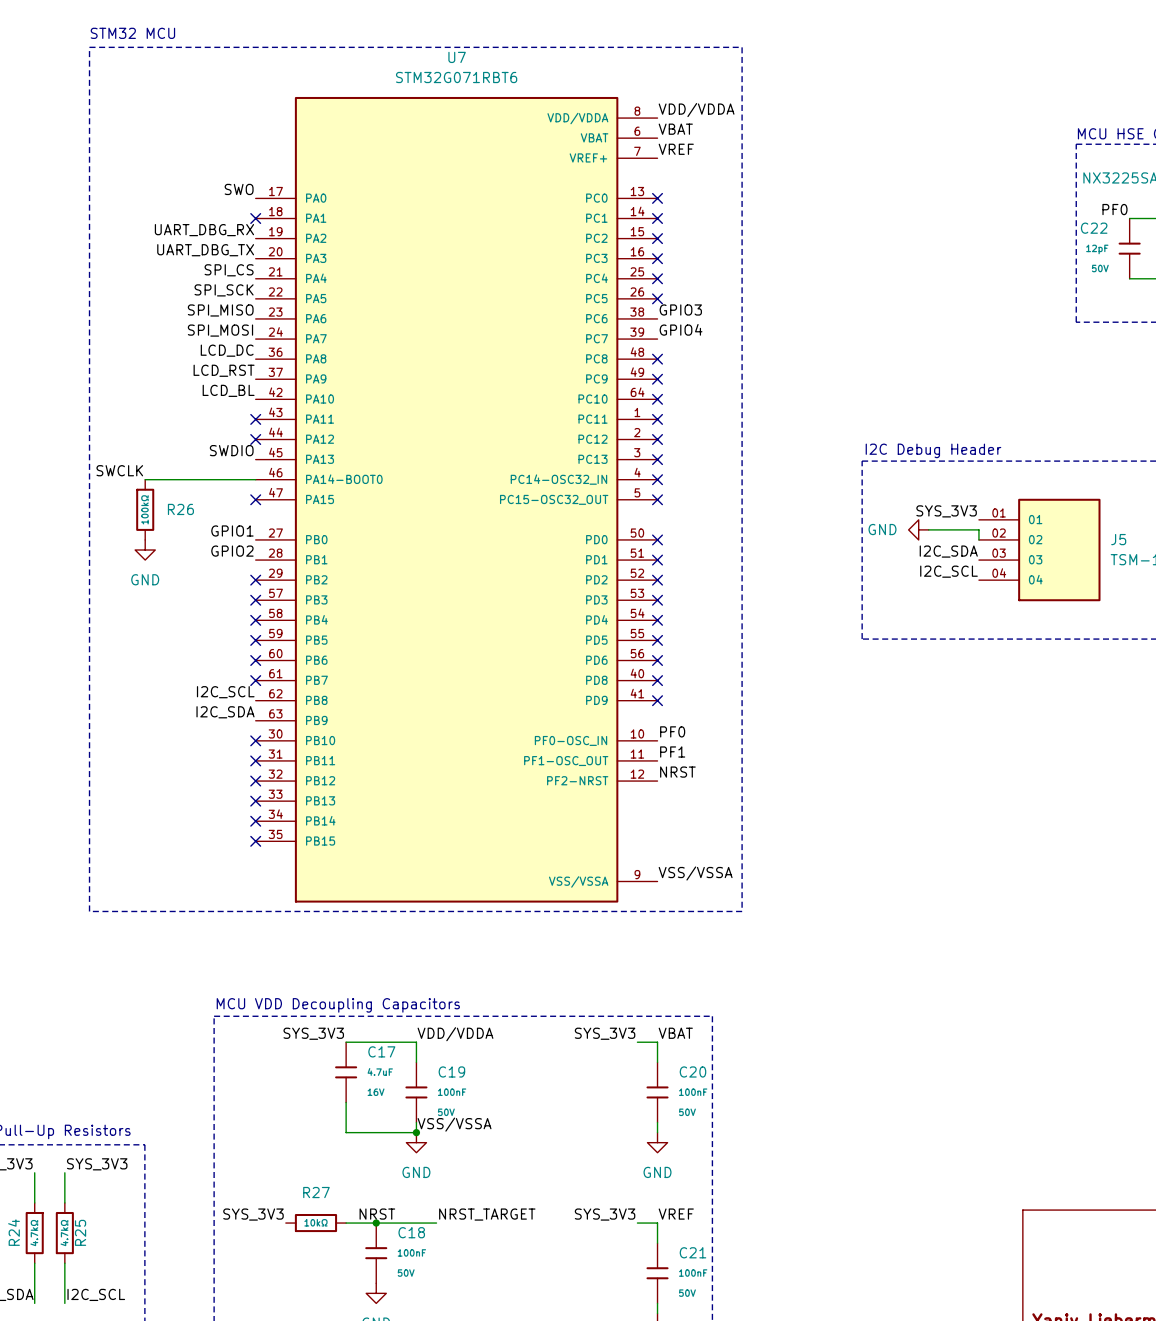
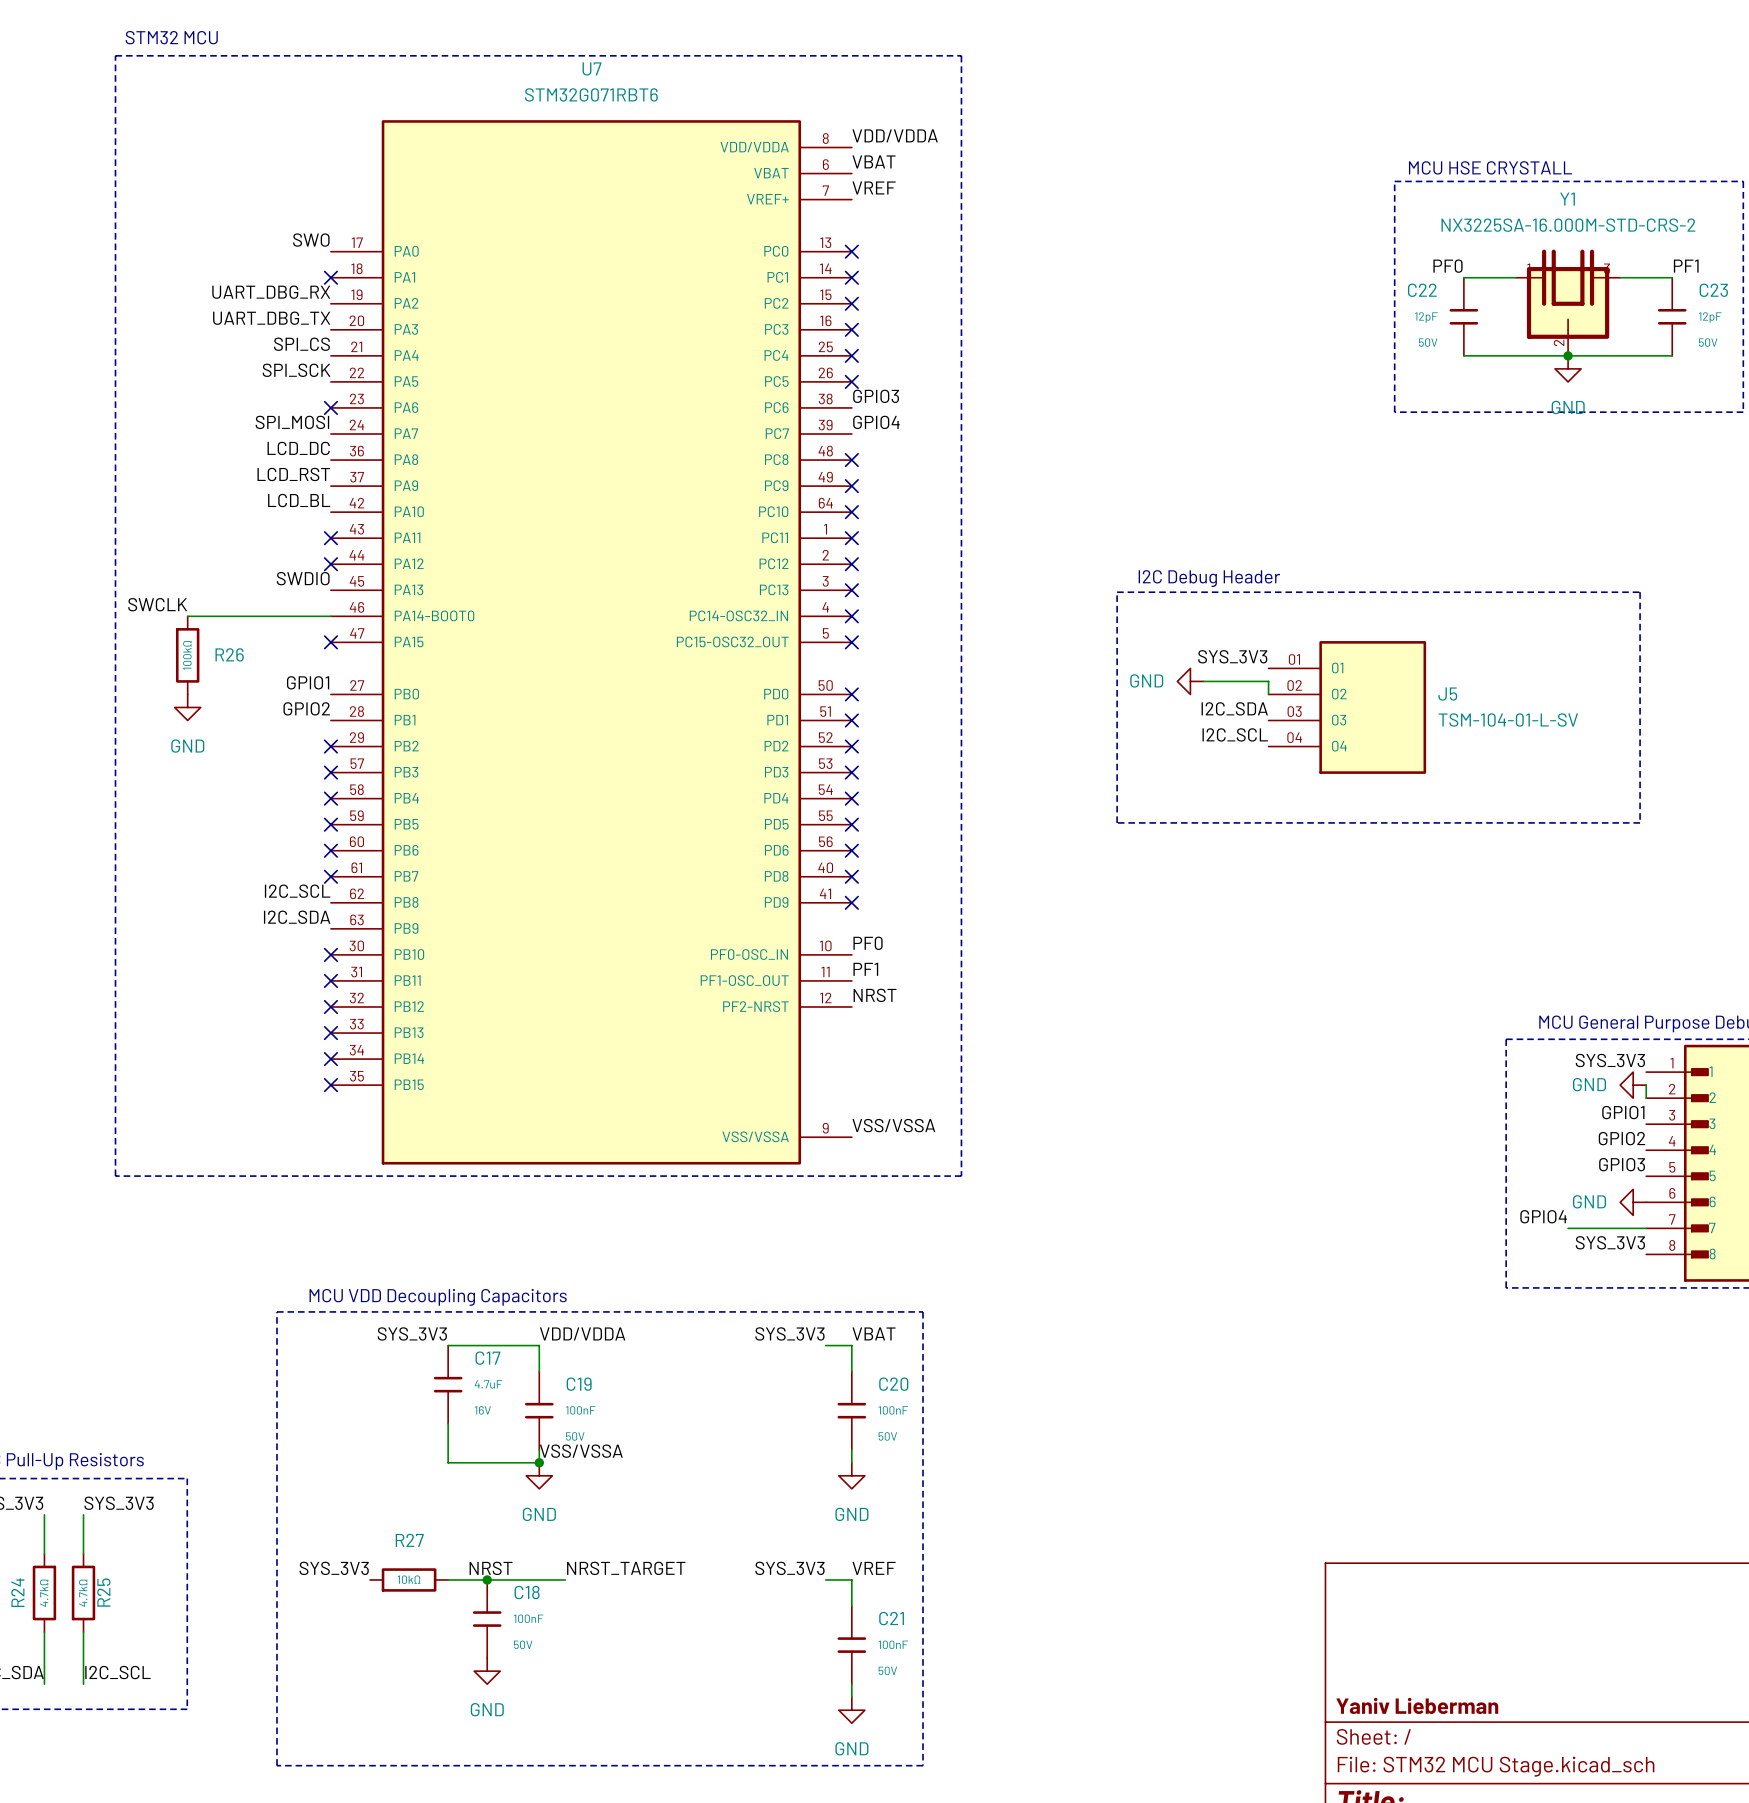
label: SPI_MISO (220, 310) -> none
no-connect mark: none -> (330, 407)

